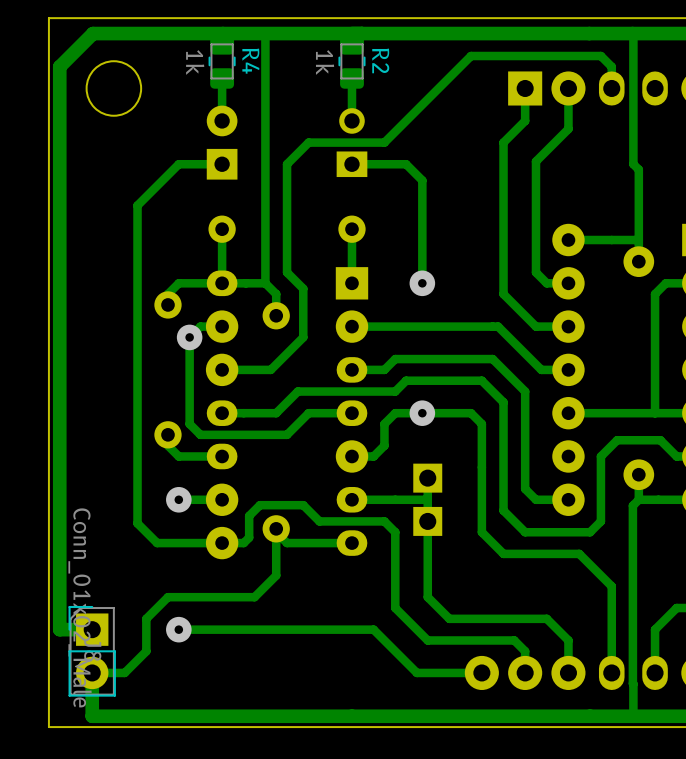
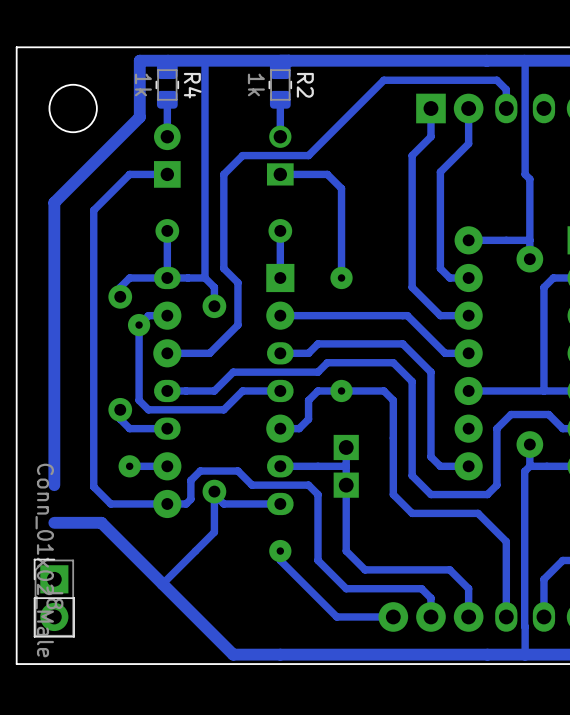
track: (190, 33) (93, 33) (59, 66) (59, 629) (92, 629) -> (139, 60) (139, 117) (54, 202) (54, 485)
track: none -> (54, 522) (101, 522) (233, 654)
track: (254, 597) (167, 597) (146, 618) (146, 651) (124, 672) (92, 672) (92, 716) (297, 716) -> (195, 551) (162, 584)
via: none -> (280, 551)
via: (178, 629) -> none
track: (373, 629) (178, 629) -> (299, 579) (280, 560) (280, 551)

